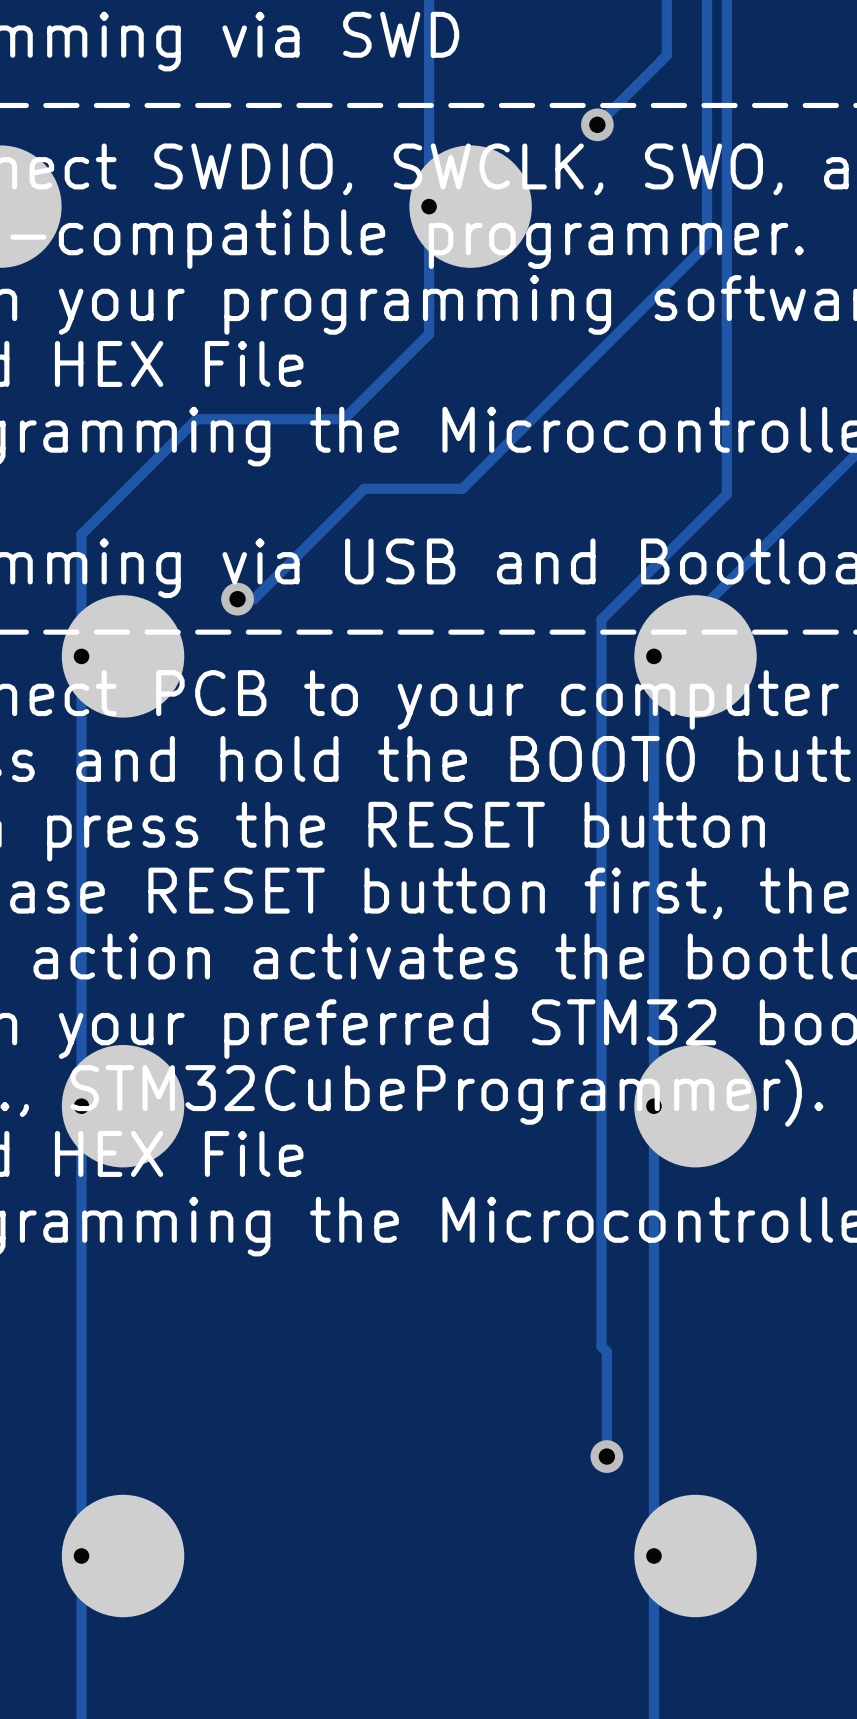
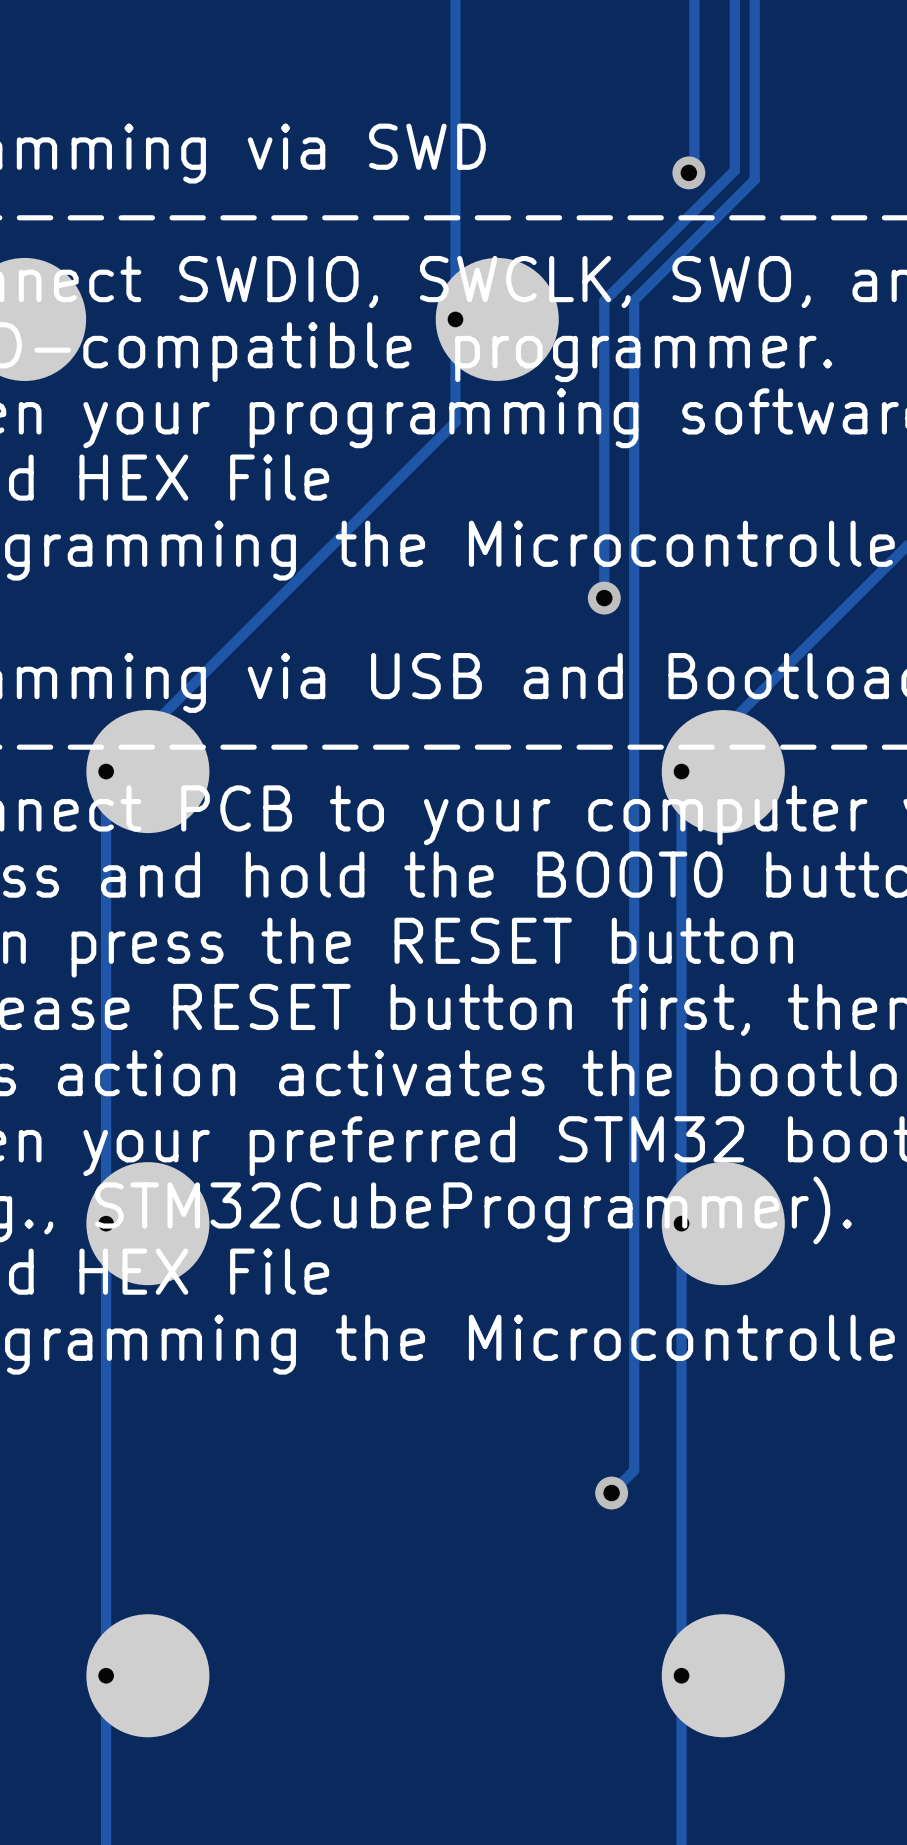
track: (707, 58) (707, 244) (462, 488) (364, 488) (253, 599) (237, 599) -> (734, 170) (604, 301) (604, 598)
track: (661, 60) (597, 124) -> none
track: (726, 67) (726, 494) (601, 619) (601, 1346) (606, 1351) (605, 1457) -> (754, 179) (634, 300) (634, 1470) (611, 1493)
via position: (597, 124) -> (688, 172)
track: (429, 308) (429, 334) (343, 419) (196, 419) (81, 534) (81, 656) -> (455, 422) (106, 771)
via: none -> (604, 598)
via: (237, 599) -> none
via position: (606, 1456) -> (611, 1493)

